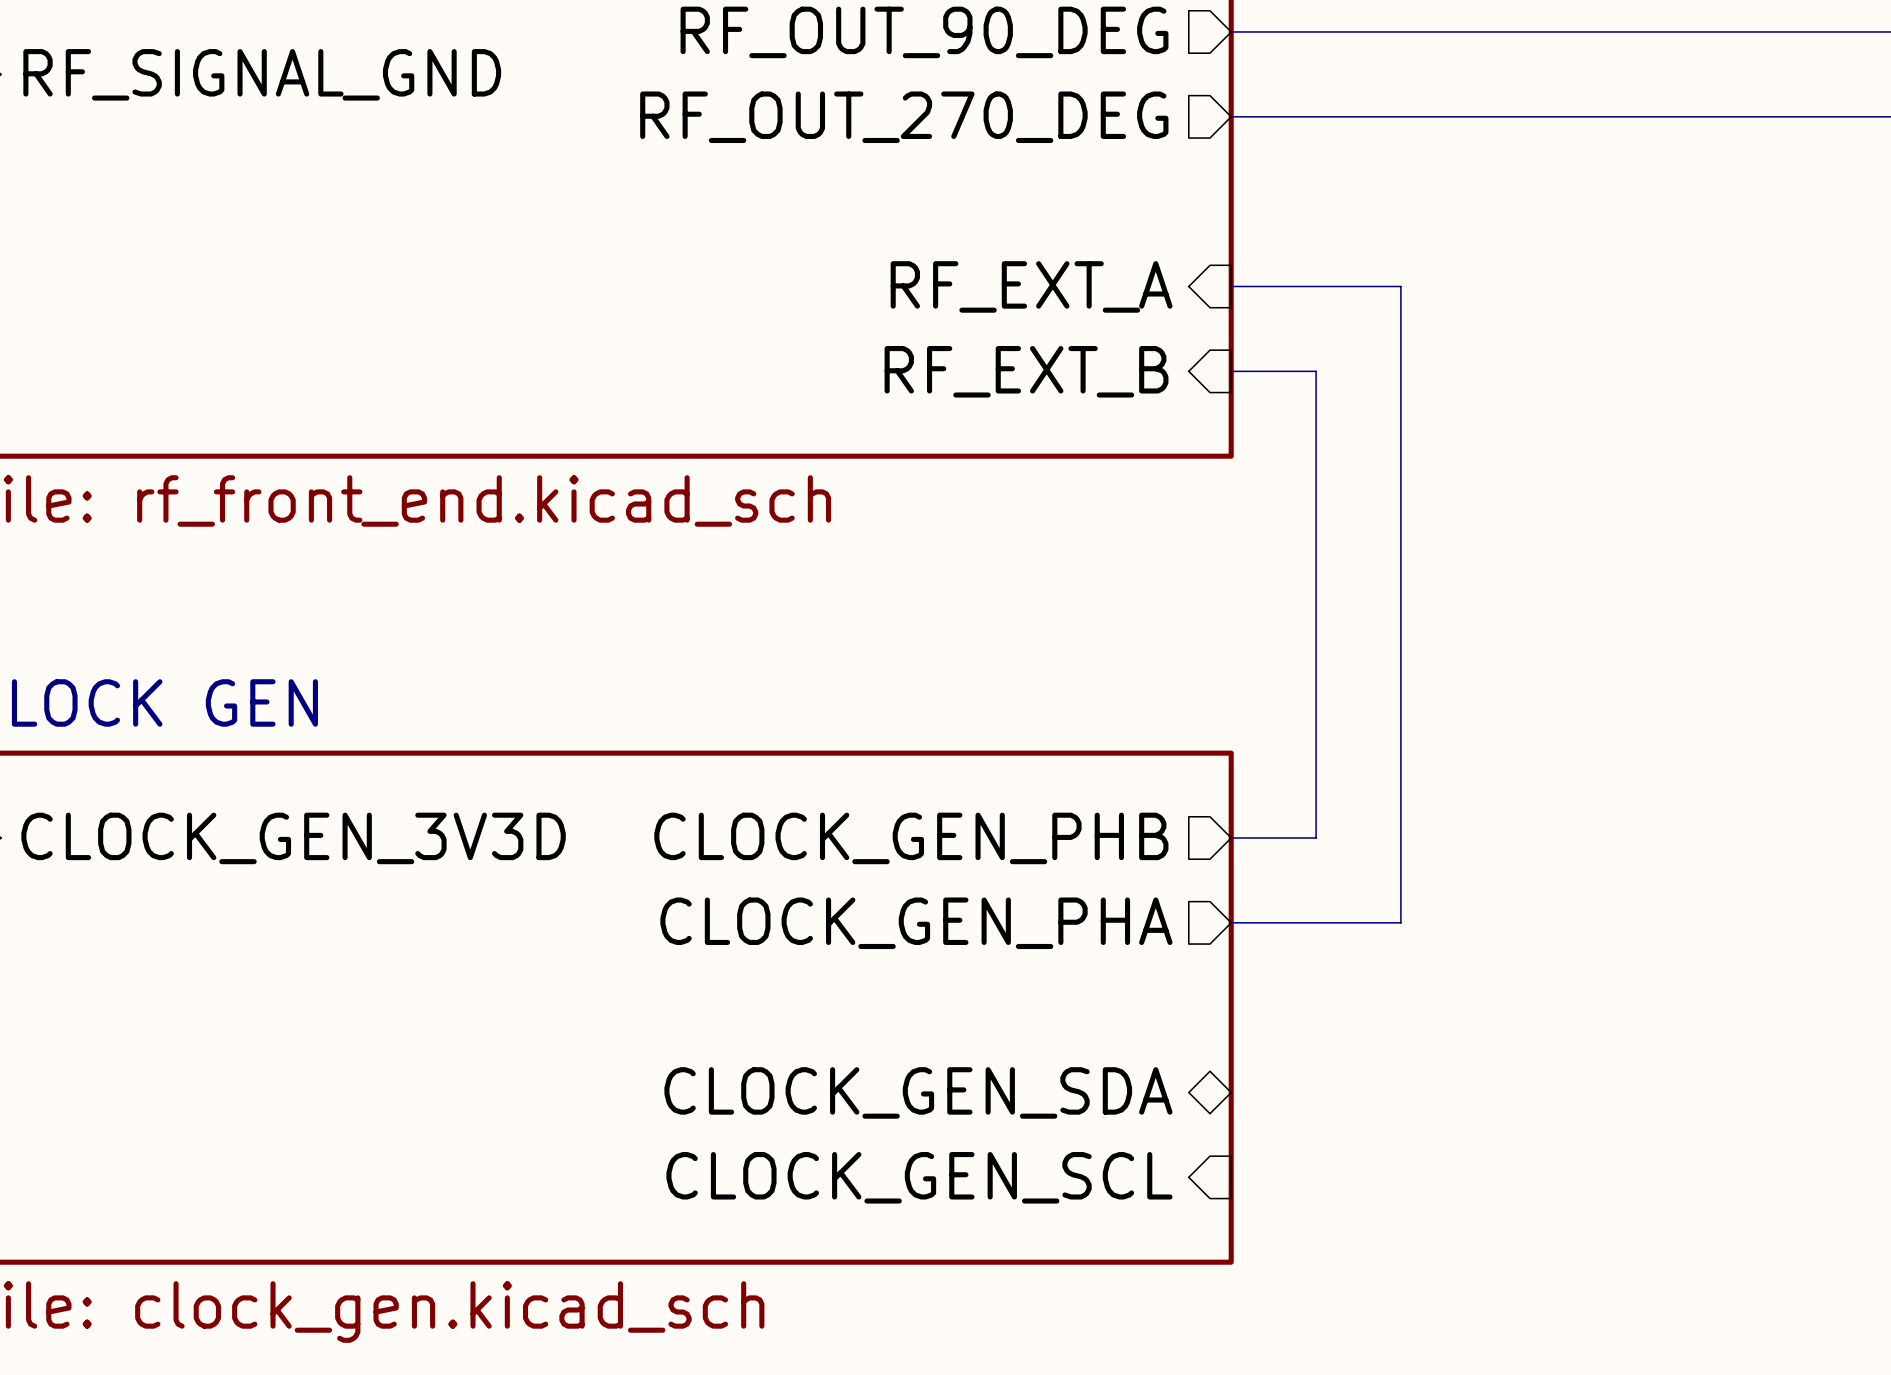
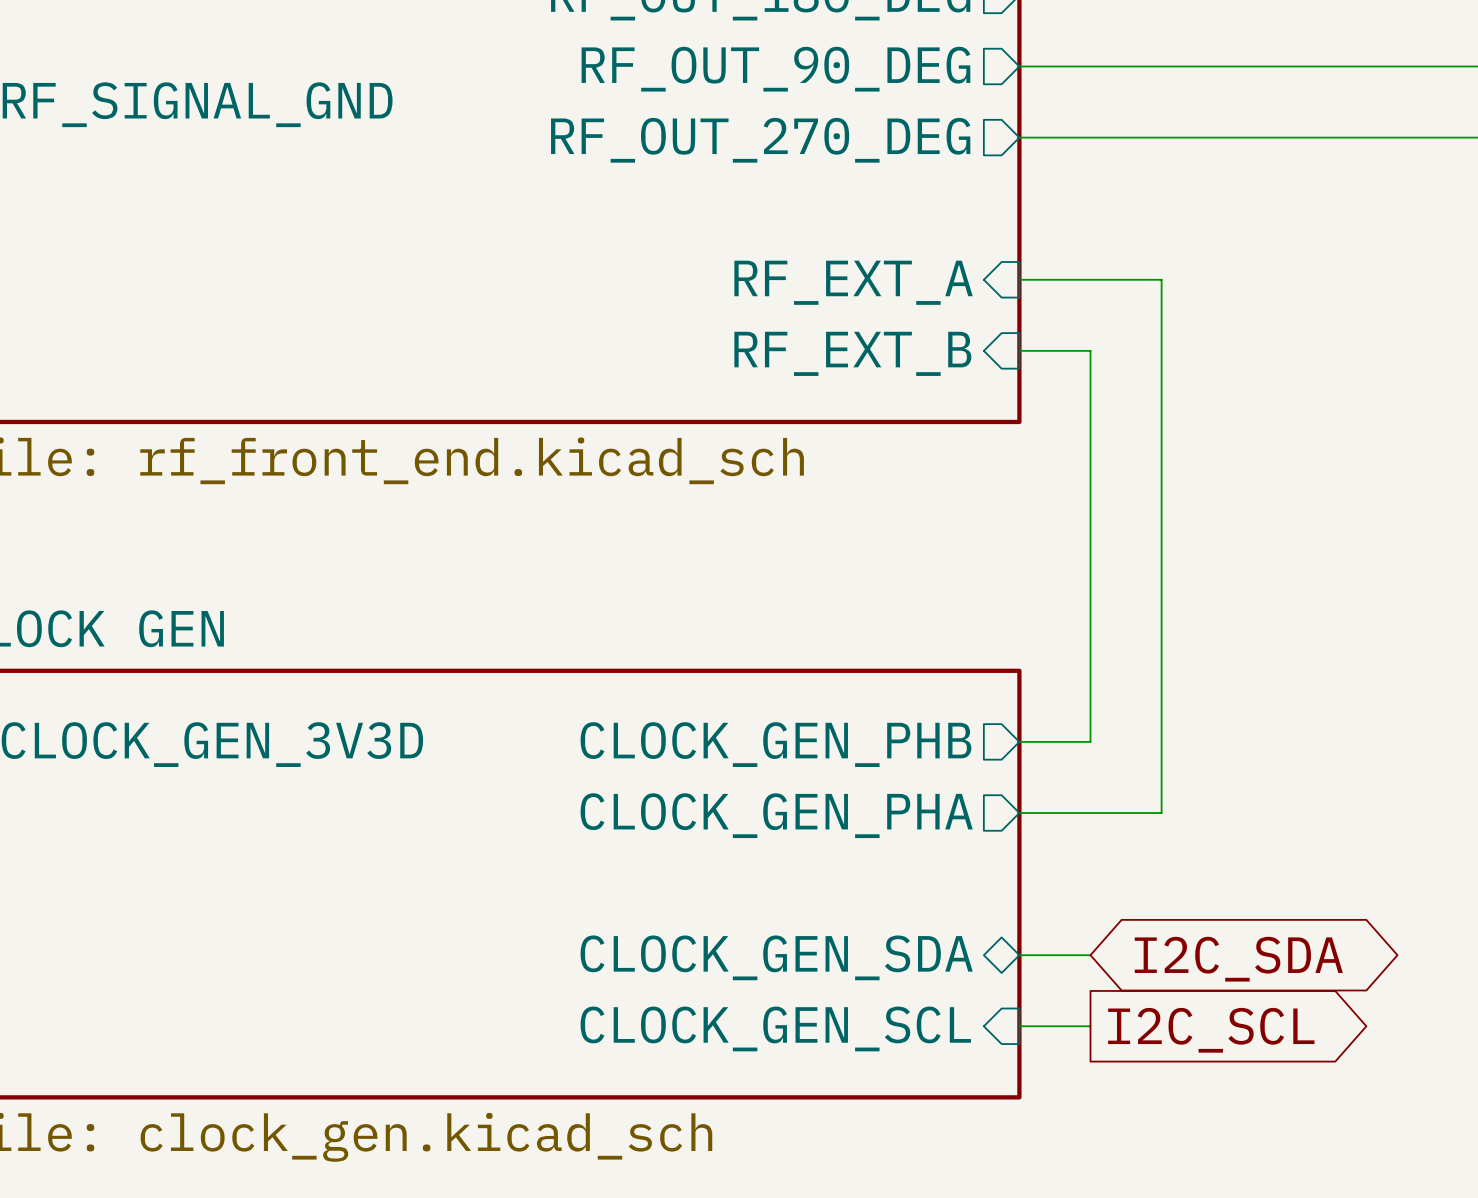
wire: none -> (1019, 955) (1090, 955)
global label: none -> I2C_SDA (1238, 959)
wire: none -> (1019, 1026) (1090, 1026)
global label: none -> I2C_SCL (1211, 1030)

